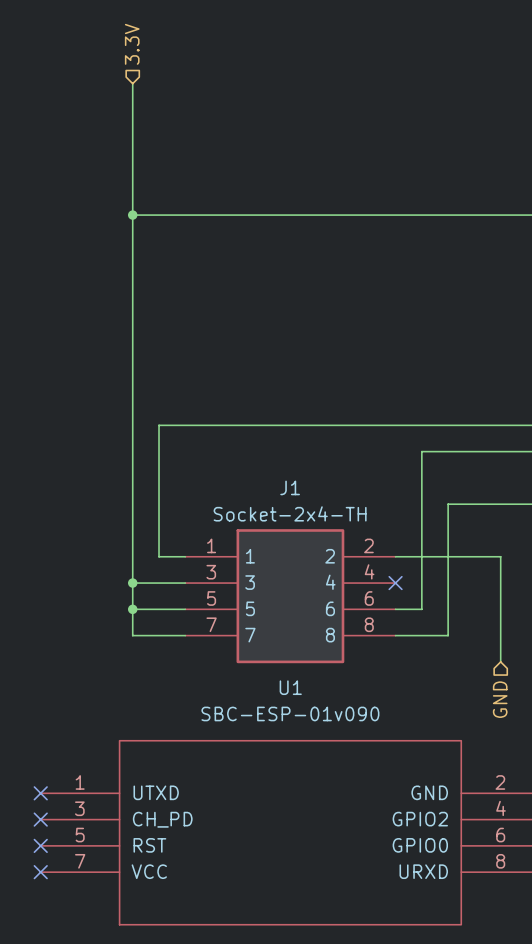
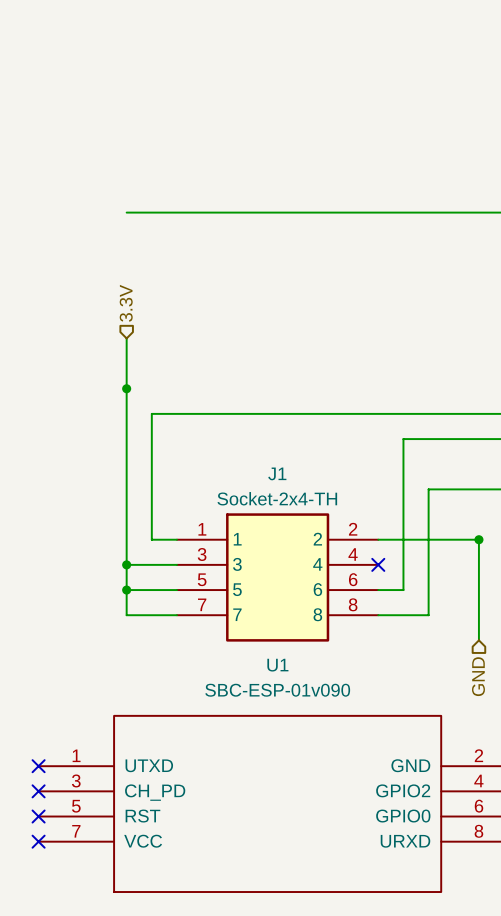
hierarchical label: 3.3V (132, 44) -> none
wire: (132, 83) (132, 346) -> none
junction: (132, 215) -> none
hierarchical label: none -> 3.3V (126, 303)
junction: none -> (126, 388)
junction: none -> (478, 539)

